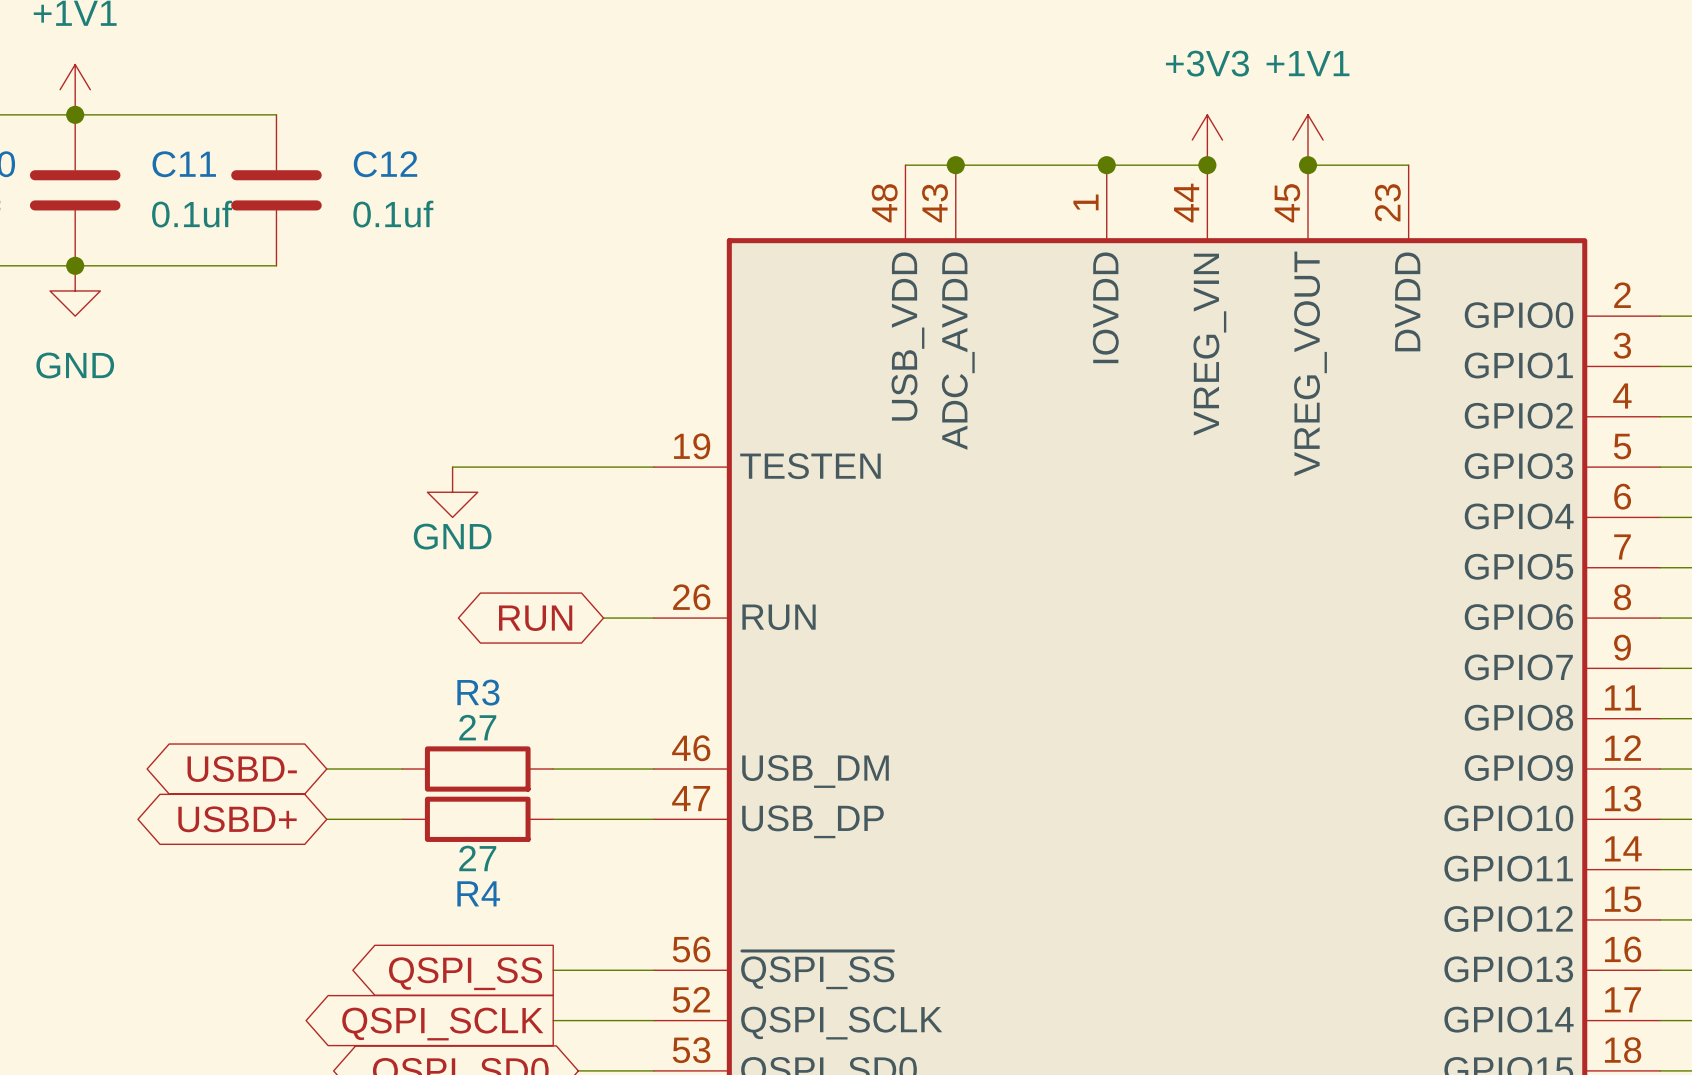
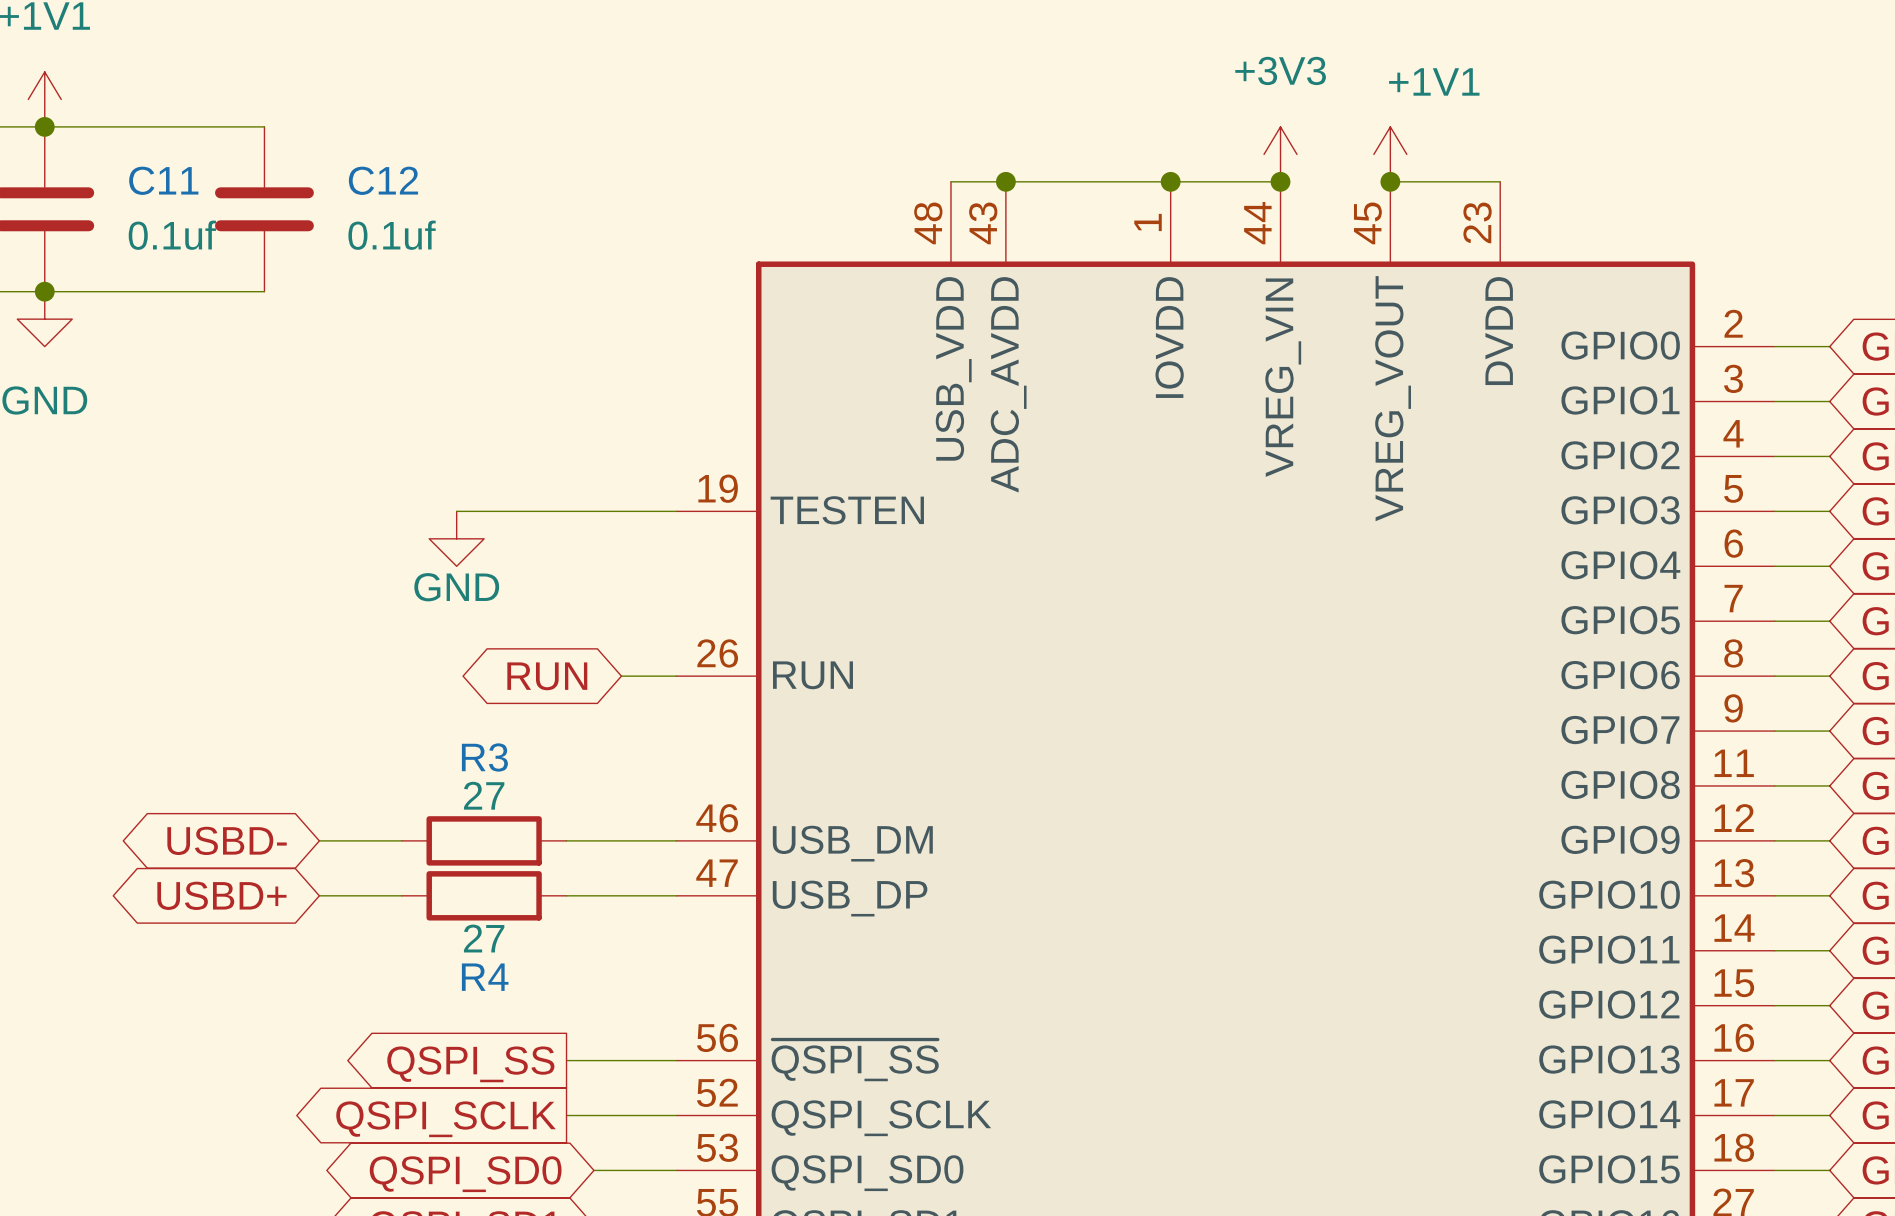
power symbol text position: +1V1 (1308, 63) -> +1V1 (1434, 81)

